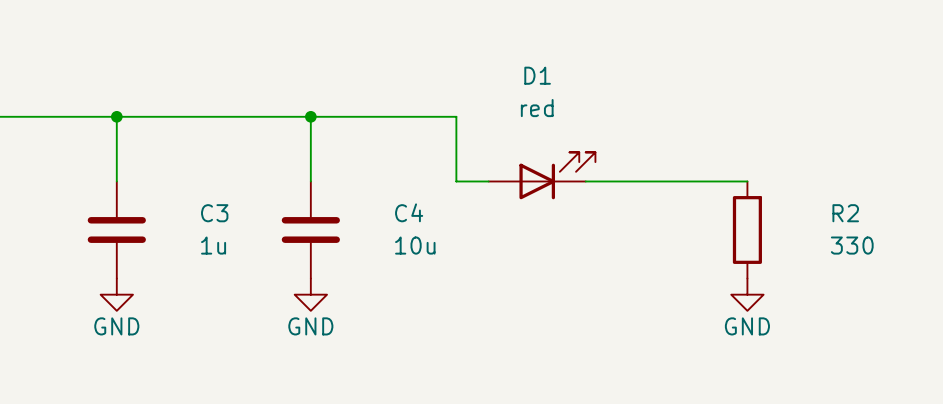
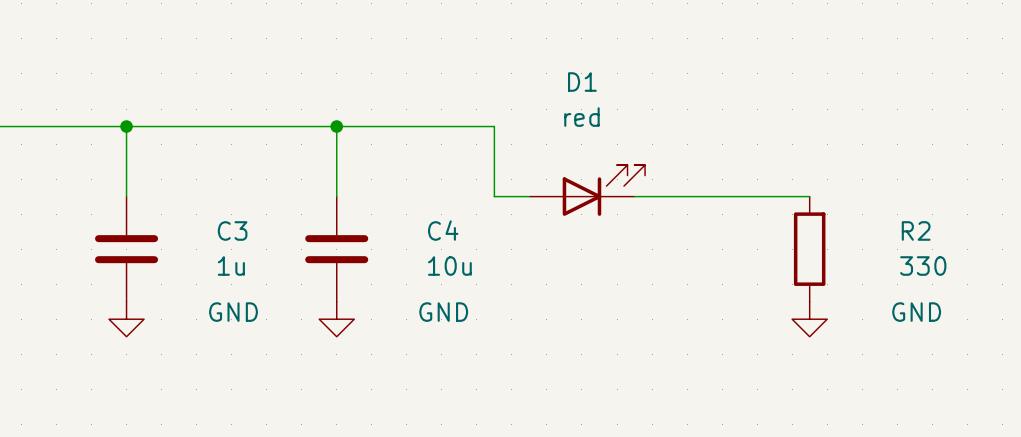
power symbol text position: GND (116, 326) -> GND (233, 312)
power symbol text position: GND (310, 326) -> GND (443, 312)
power symbol text position: GND (747, 326) -> GND (916, 312)

